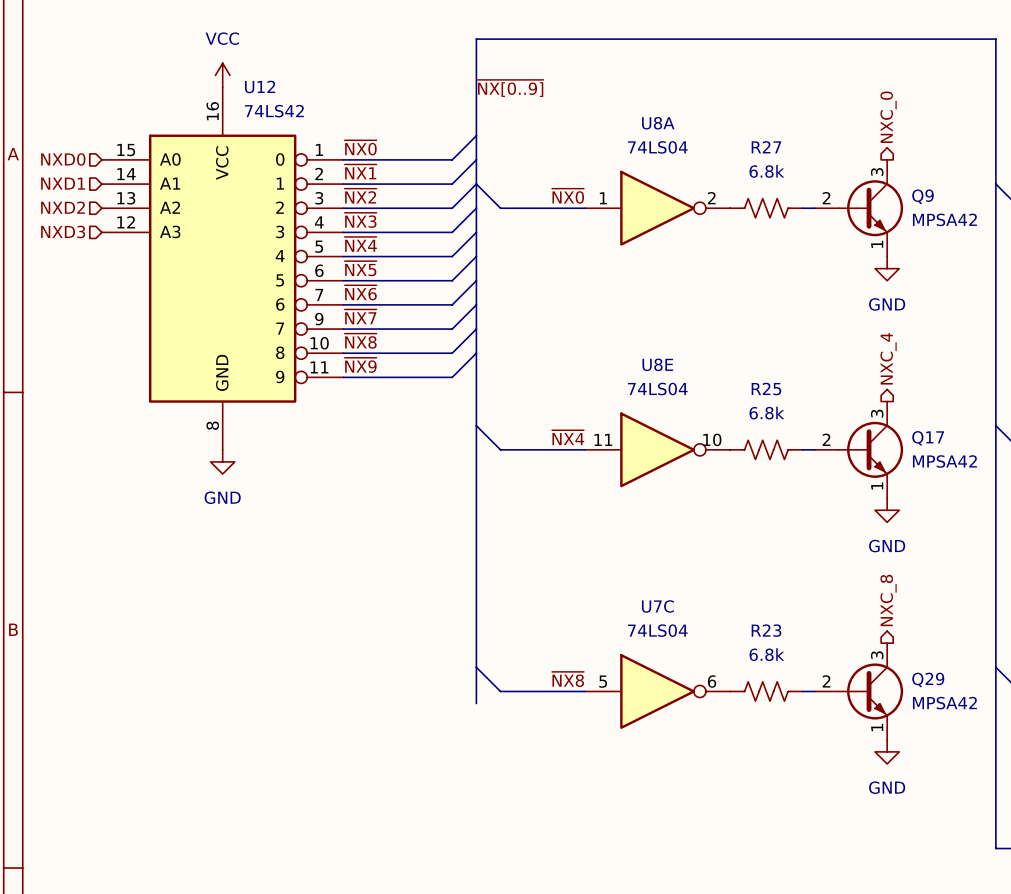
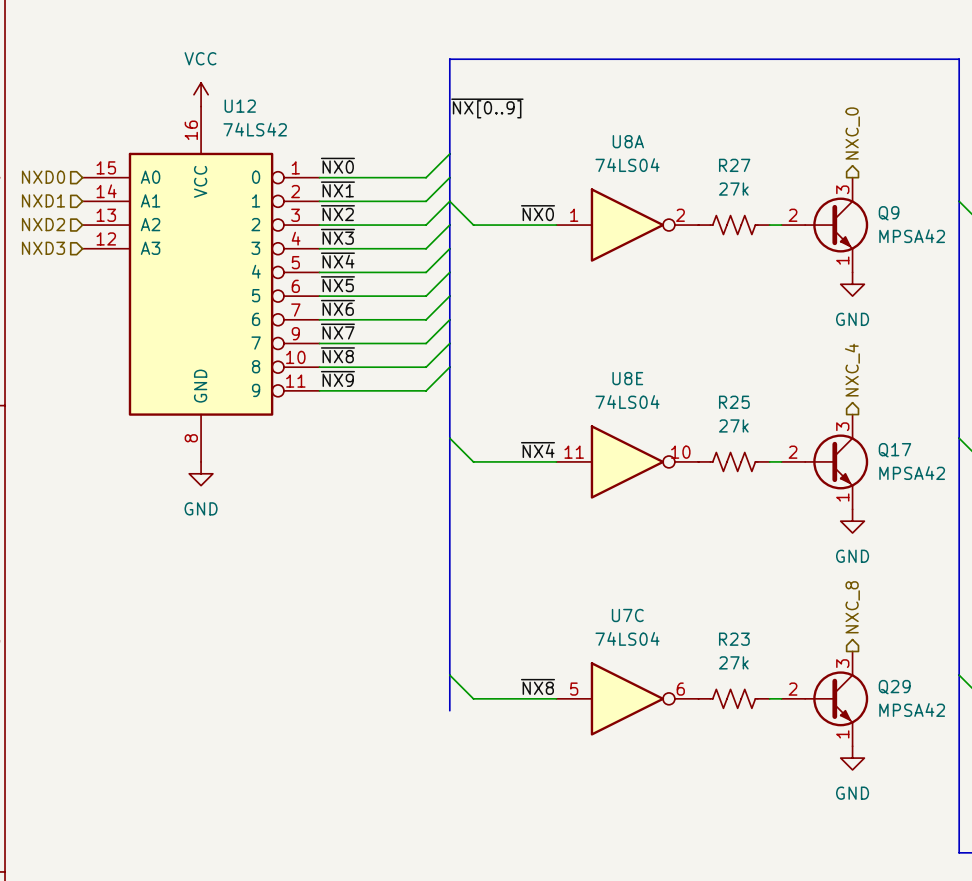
R27 value: 6.8k (766, 171) -> 27k (733, 189)
R25 value: 6.8k (766, 413) -> 27k (733, 425)
R23 value: 6.8k (766, 654) -> 27k (733, 662)

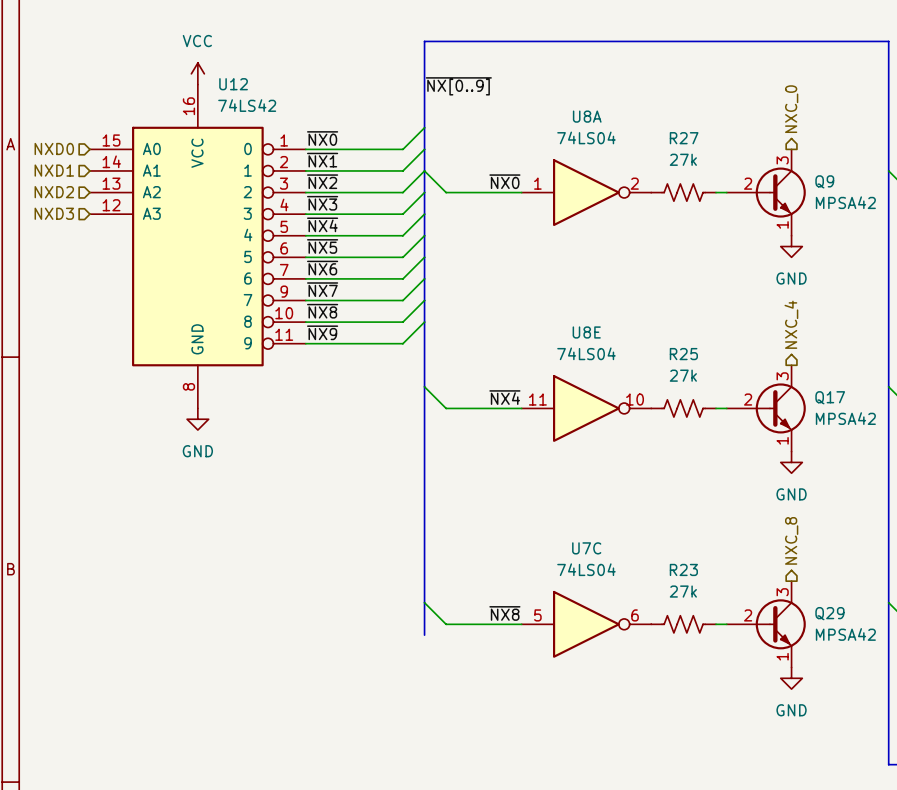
Q9 symbol: [781, 177, 869, 273] -> [726, 149, 806, 236]
Q17 symbol: [781, 414, 869, 510] -> [726, 365, 806, 452]
Q29 symbol: [781, 651, 869, 747] -> [726, 581, 806, 668]

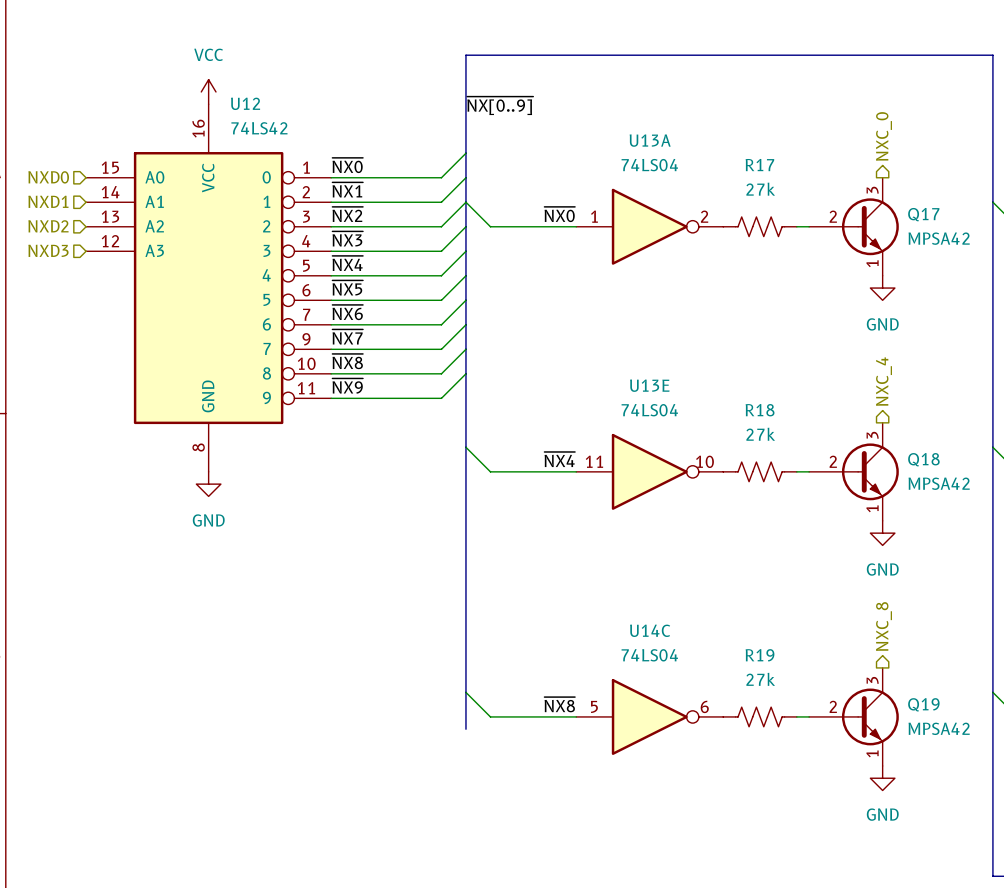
U8A name: U8A (587, 116) -> U13A (650, 140)
R27 name: R27 (684, 138) -> R17 (759, 165)
Q9 name: Q9 (824, 181) -> Q17 (923, 214)
U8E name: U8E (586, 332) -> U13E (649, 385)
R25 name: R25 (683, 354) -> R18 (760, 410)
Q17 name: Q17 (830, 397) -> Q18 (923, 459)
U7C name: U7C (586, 548) -> U14C (650, 630)
R23 name: R23 (683, 569) -> R19 (760, 655)
Q29 name: Q29 (829, 613) -> Q19 (923, 704)

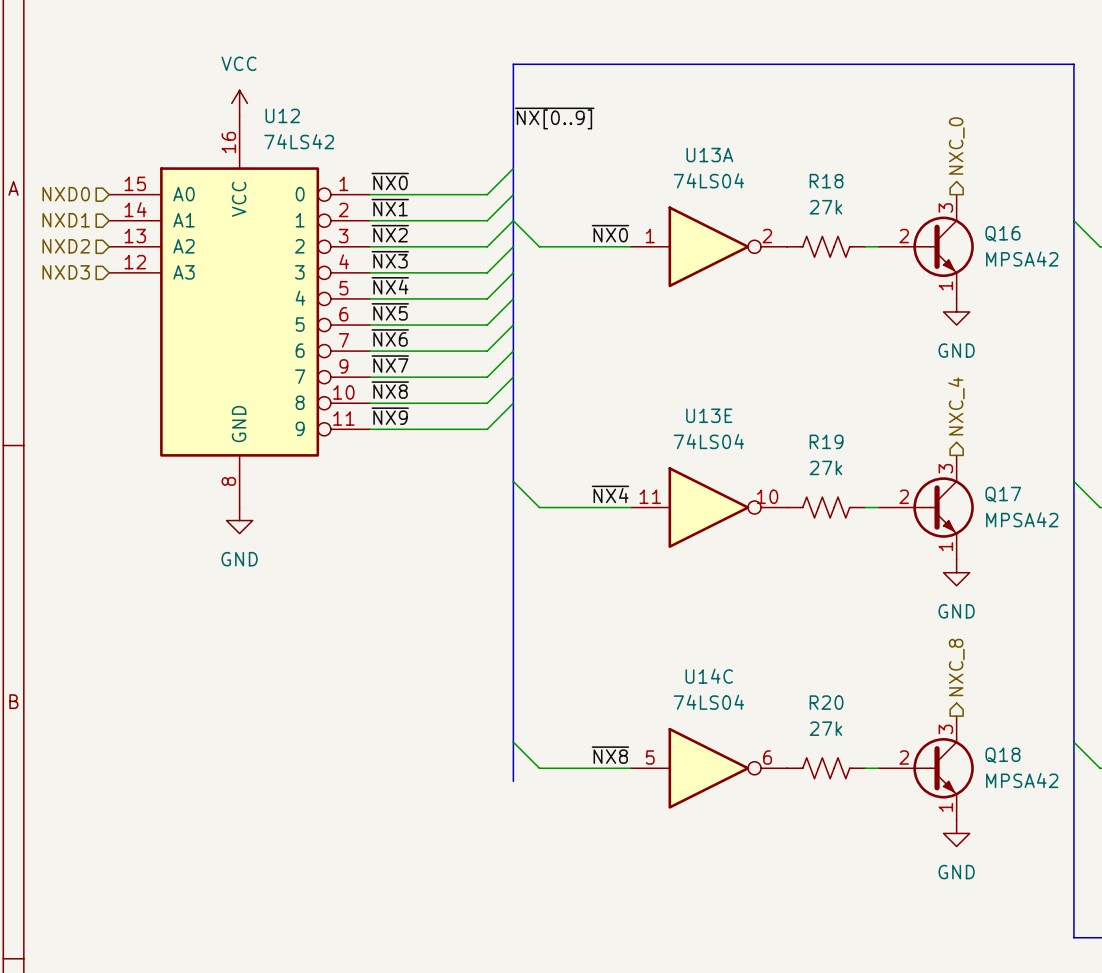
R17 name: R17 (759, 165) -> R18 (826, 181)
Q17 name: Q17 (923, 214) -> Q16 (1002, 233)
R18 name: R18 (760, 410) -> R19 (826, 441)
Q18 name: Q18 (923, 459) -> Q17 (1003, 494)
R19 name: R19 (760, 655) -> R20 (826, 702)
Q19 name: Q19 (923, 704) -> Q18 (1002, 755)

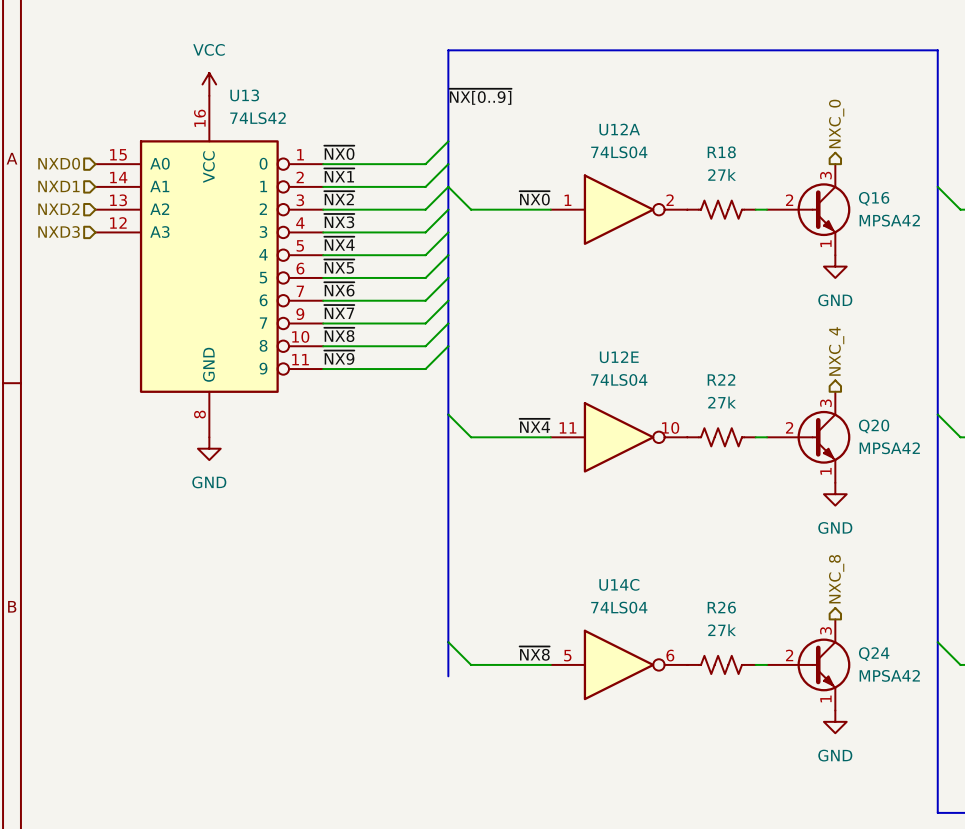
U12 name: U12 (282, 115) -> U13 (244, 95)
U13A name: U13A (709, 155) -> U12A (619, 129)
U13E name: U13E (709, 415) -> U12E (619, 357)
R19 name: R19 (826, 441) -> R22 (721, 379)
Q17 name: Q17 (1003, 494) -> Q20 (874, 426)
R20 name: R20 (826, 702) -> R26 (721, 607)
Q18 name: Q18 (1002, 755) -> Q24 (874, 654)

